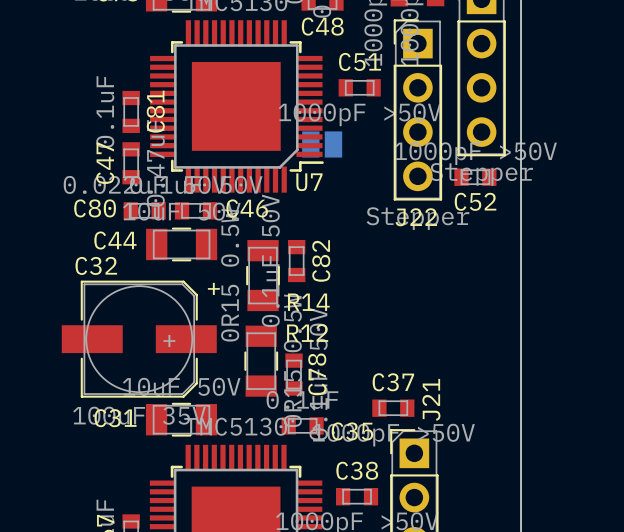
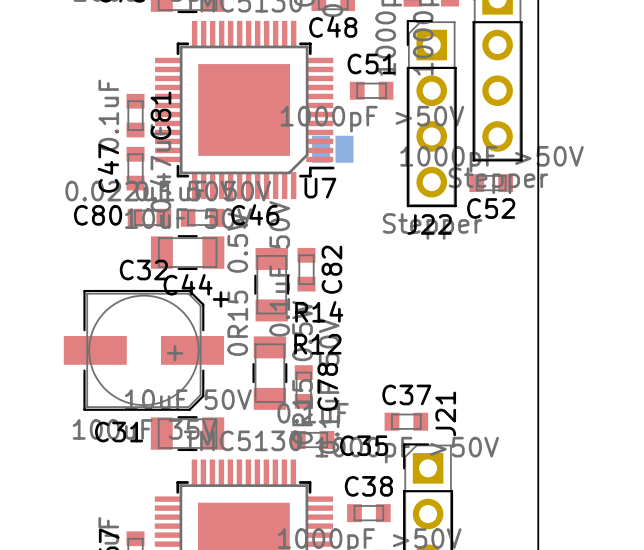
C44 name position: C44 (115, 240) -> C44 (188, 284)
C32 name position: C32 (96, 265) -> C32 (143, 269)

